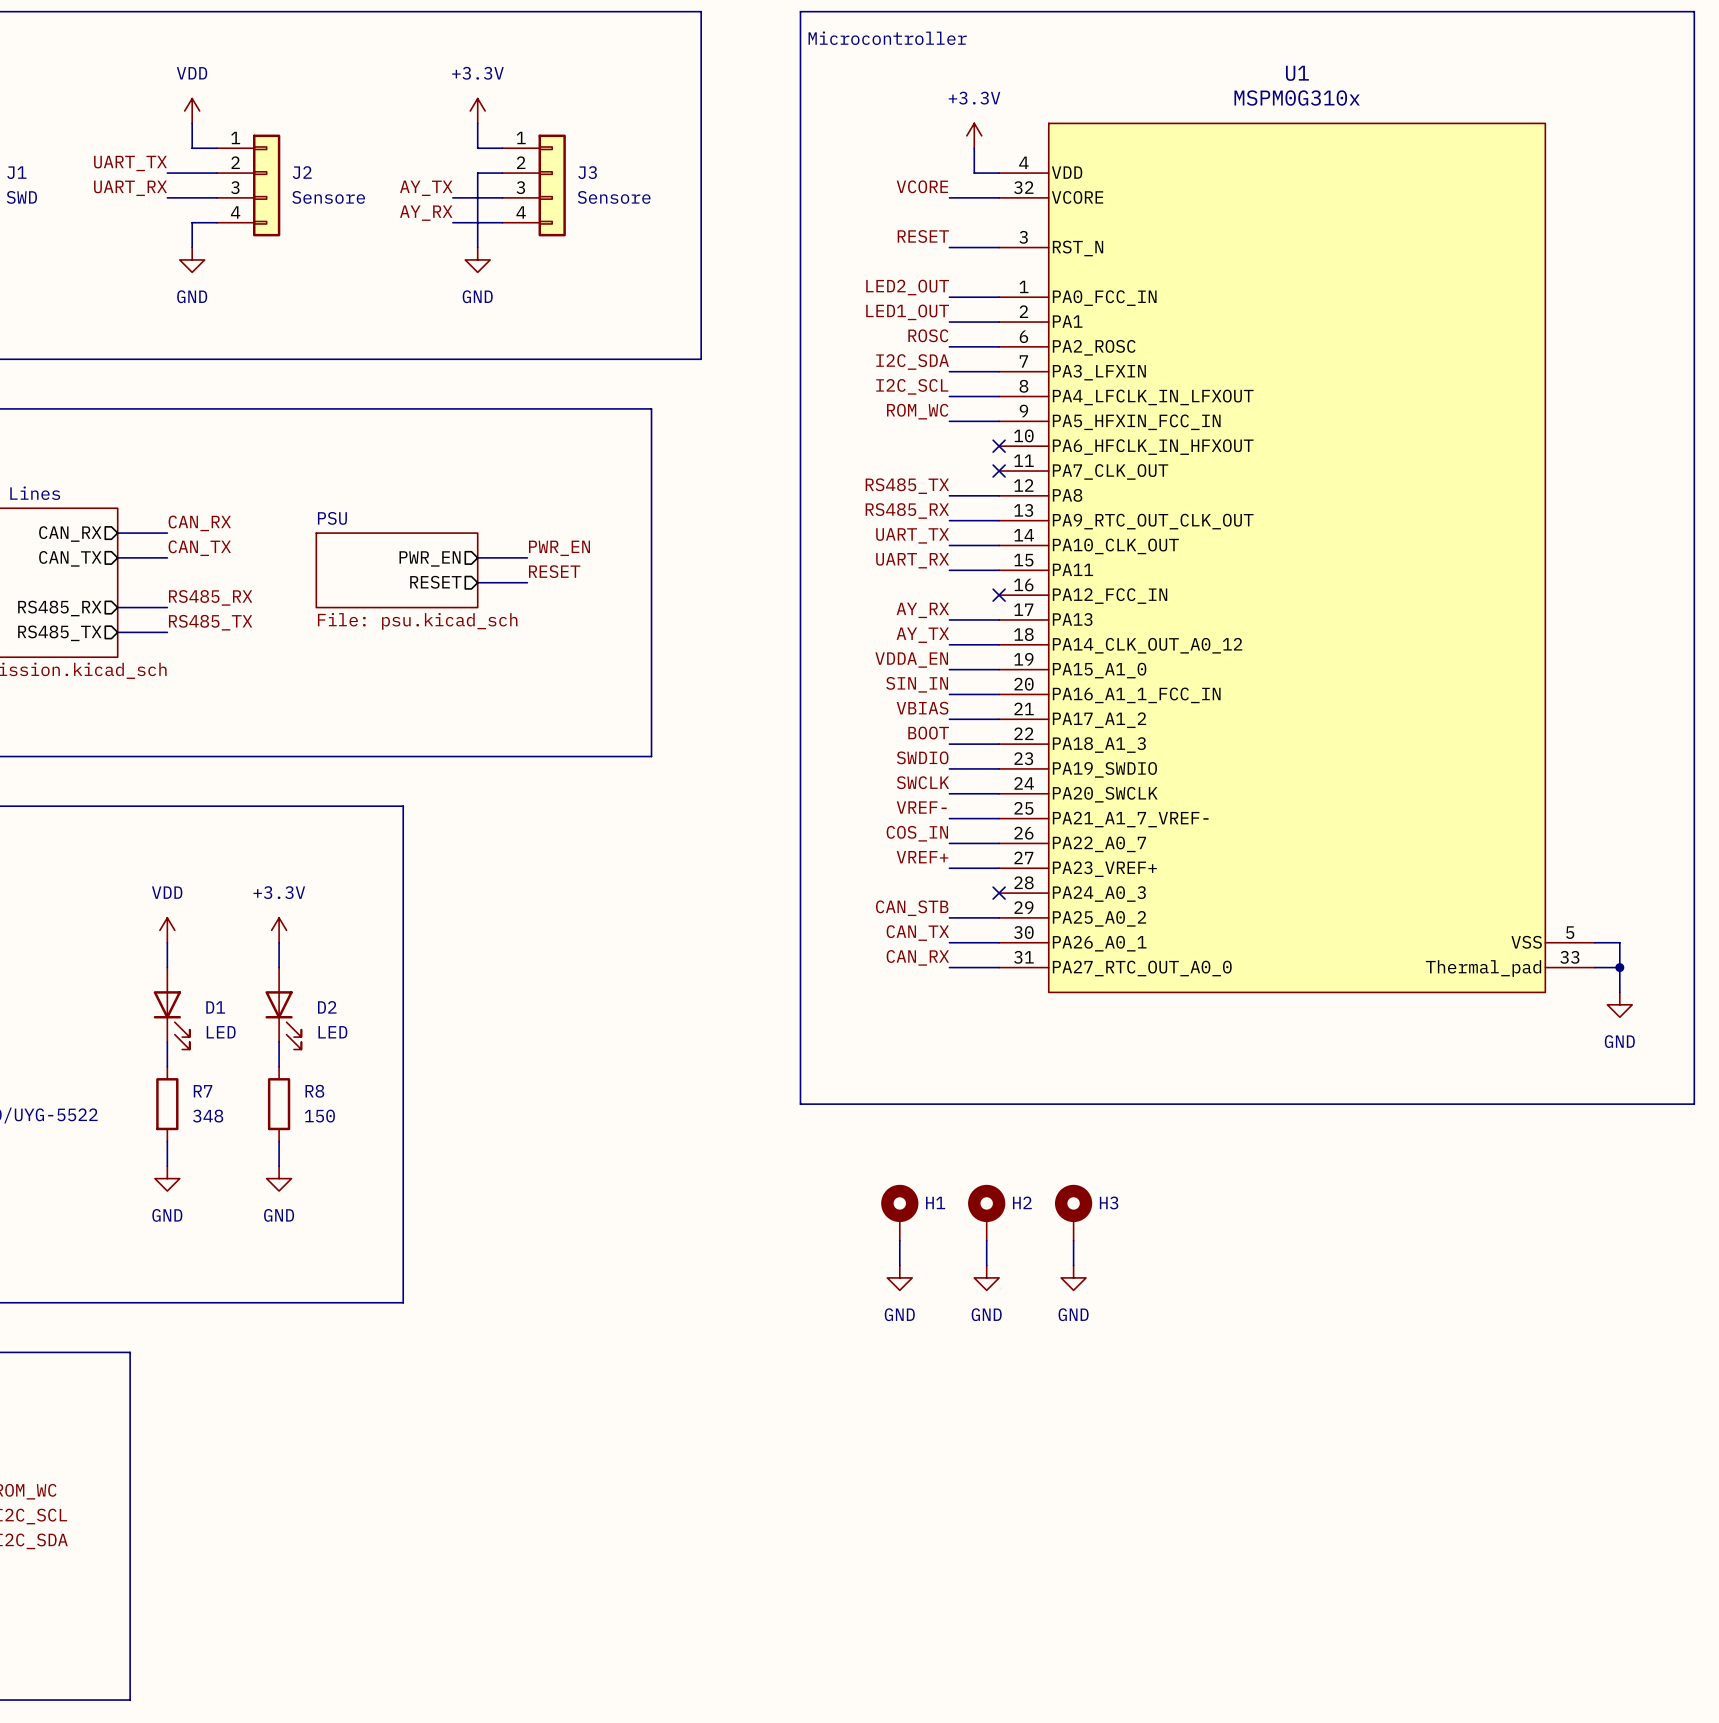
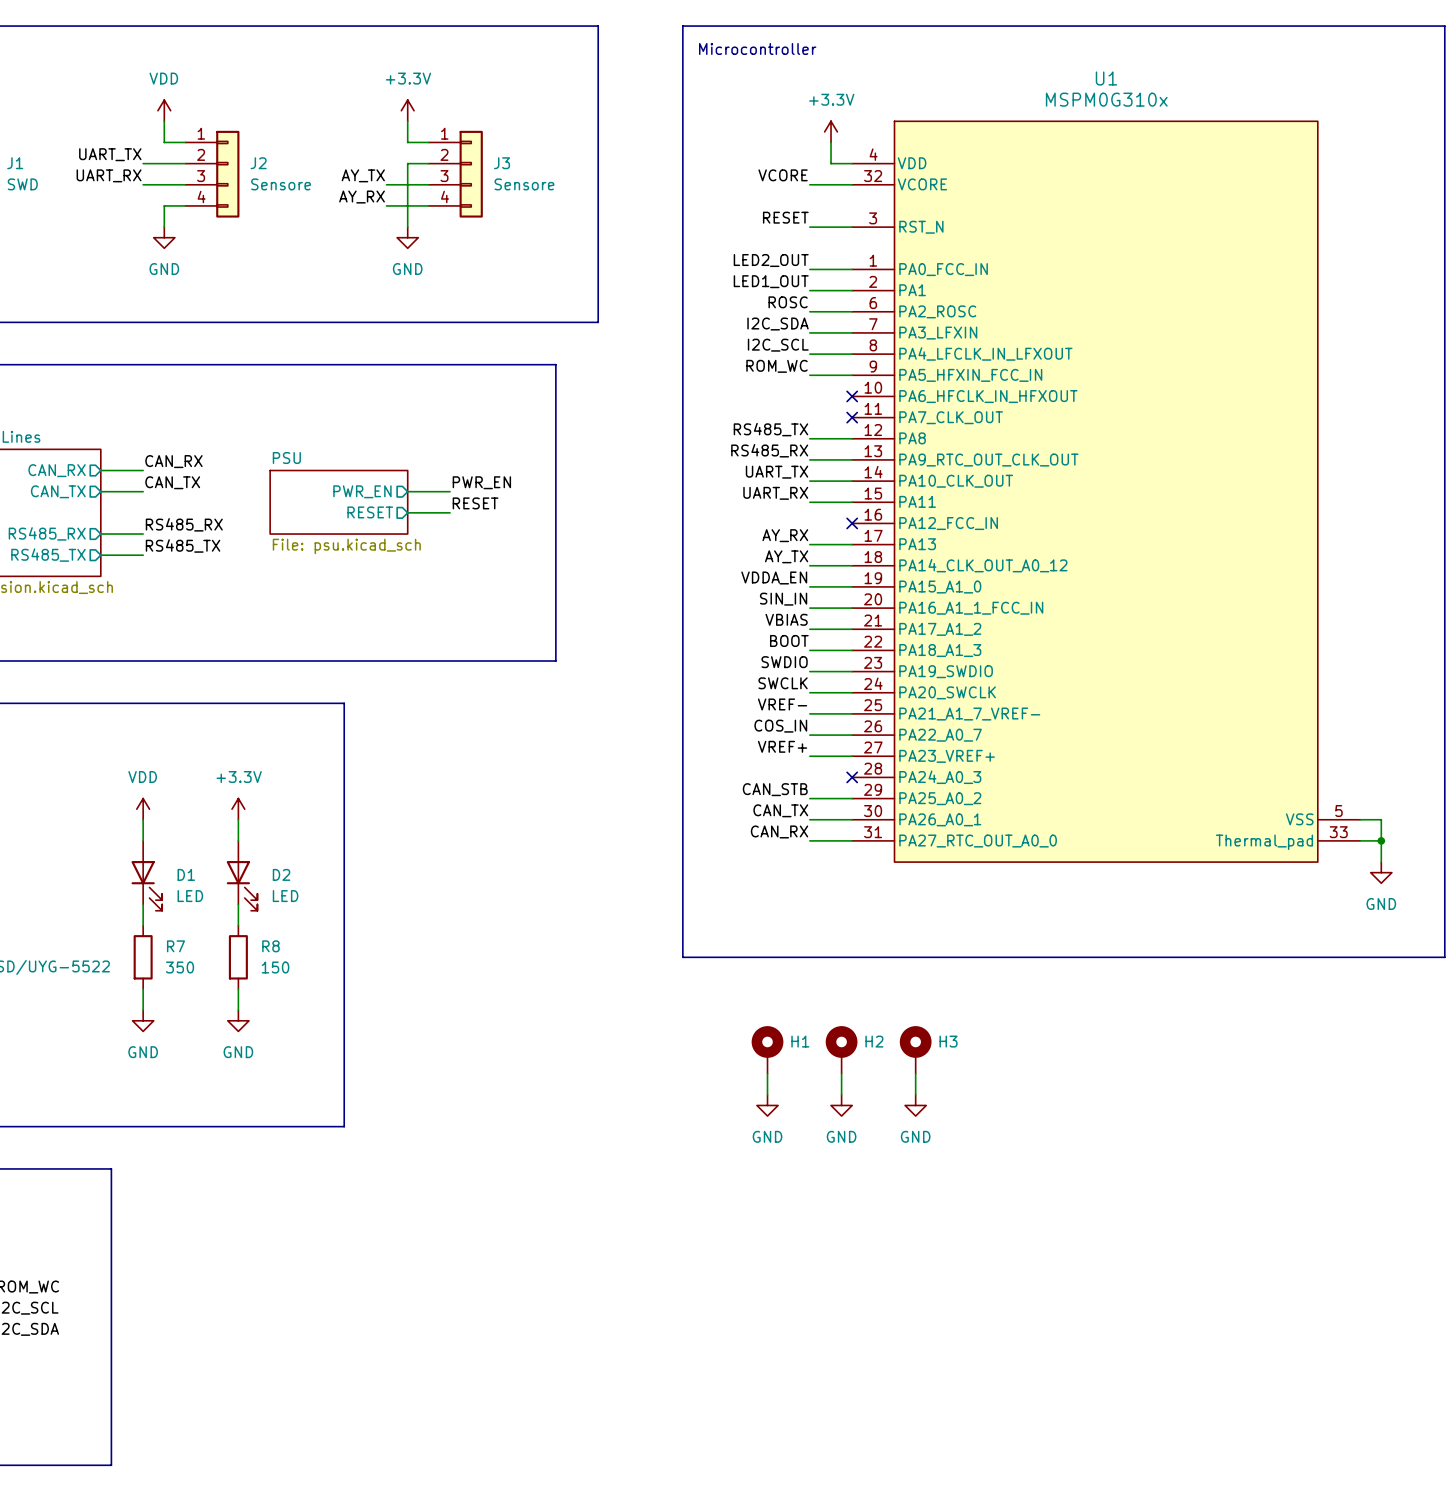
R7 value: 348 (208, 1116) -> 350 (180, 967)

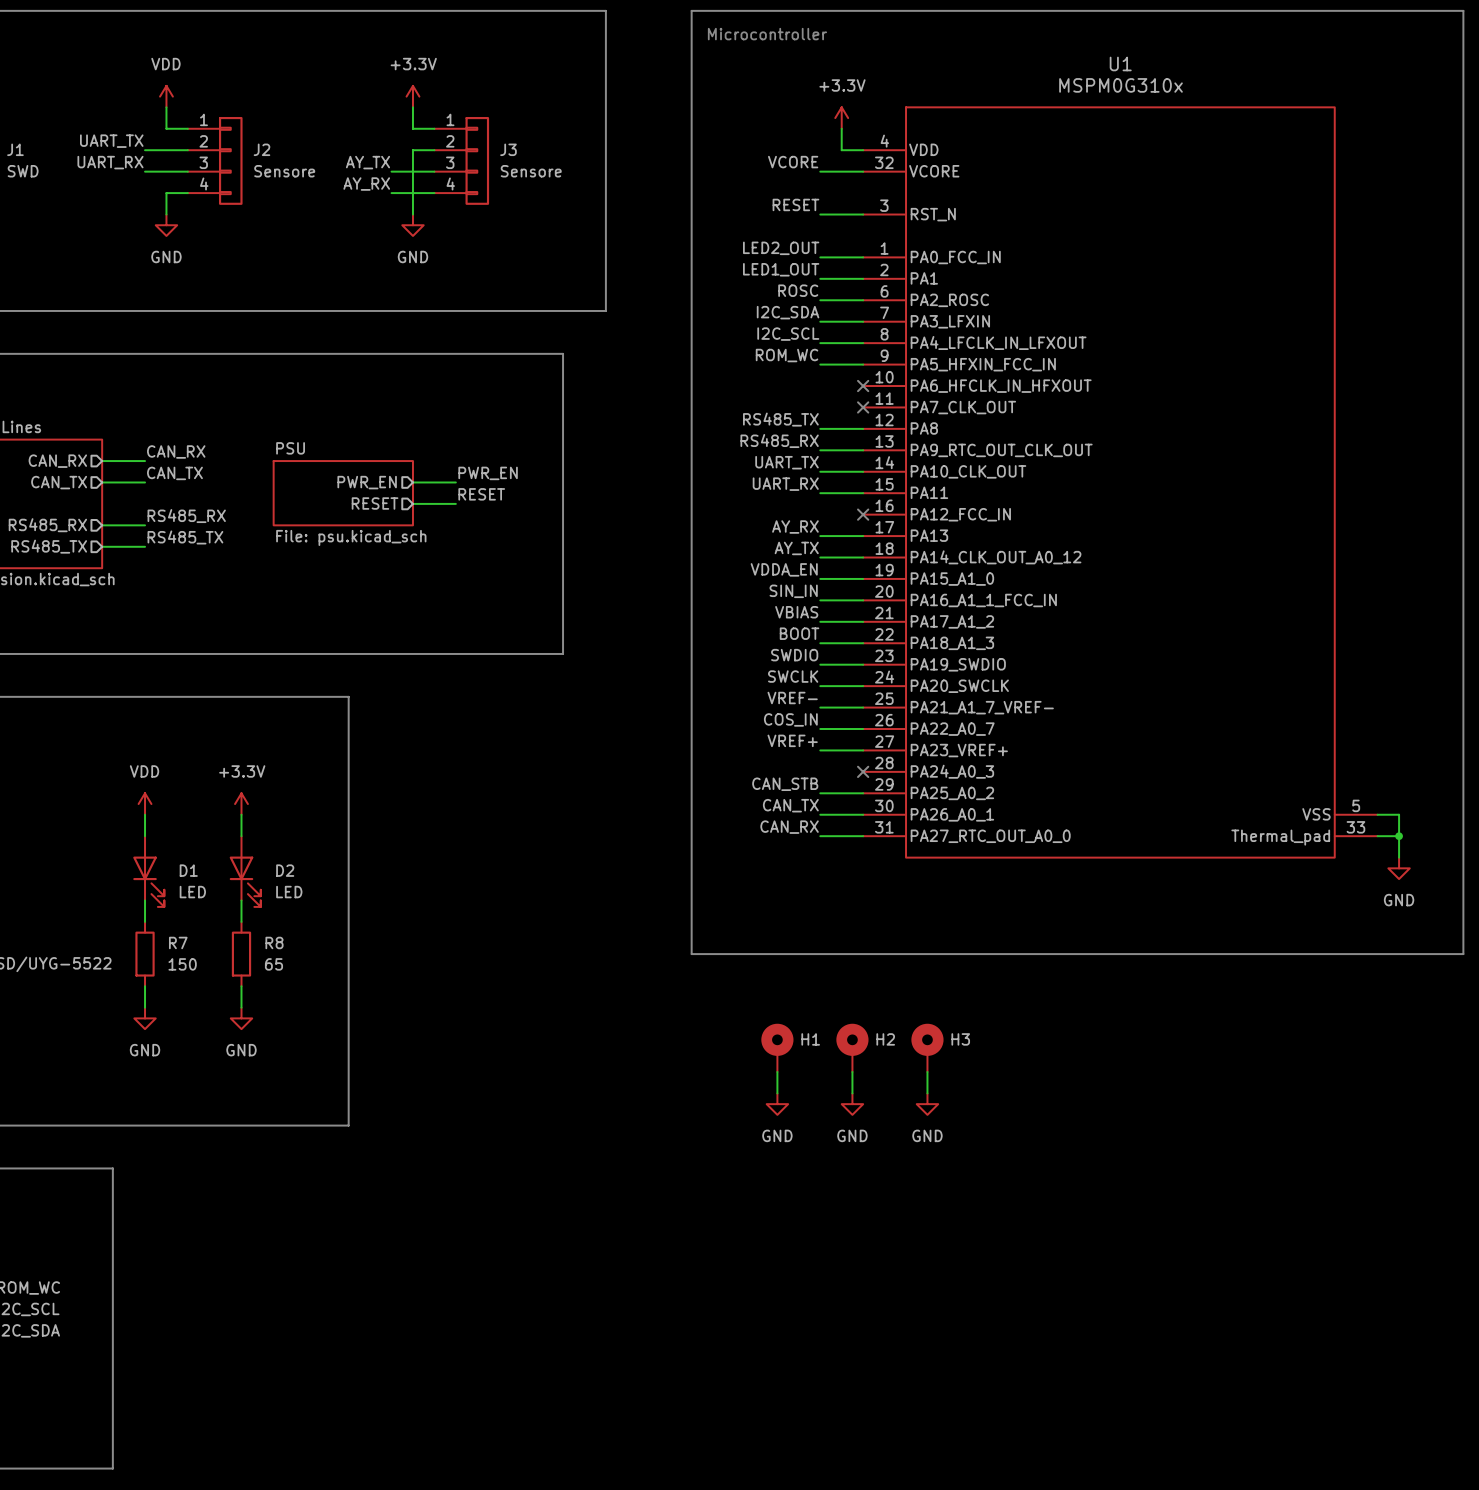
R7 value: 350 (180, 967) -> 150 (182, 964)
R8 value: 150 (275, 967) -> 65 (273, 964)

